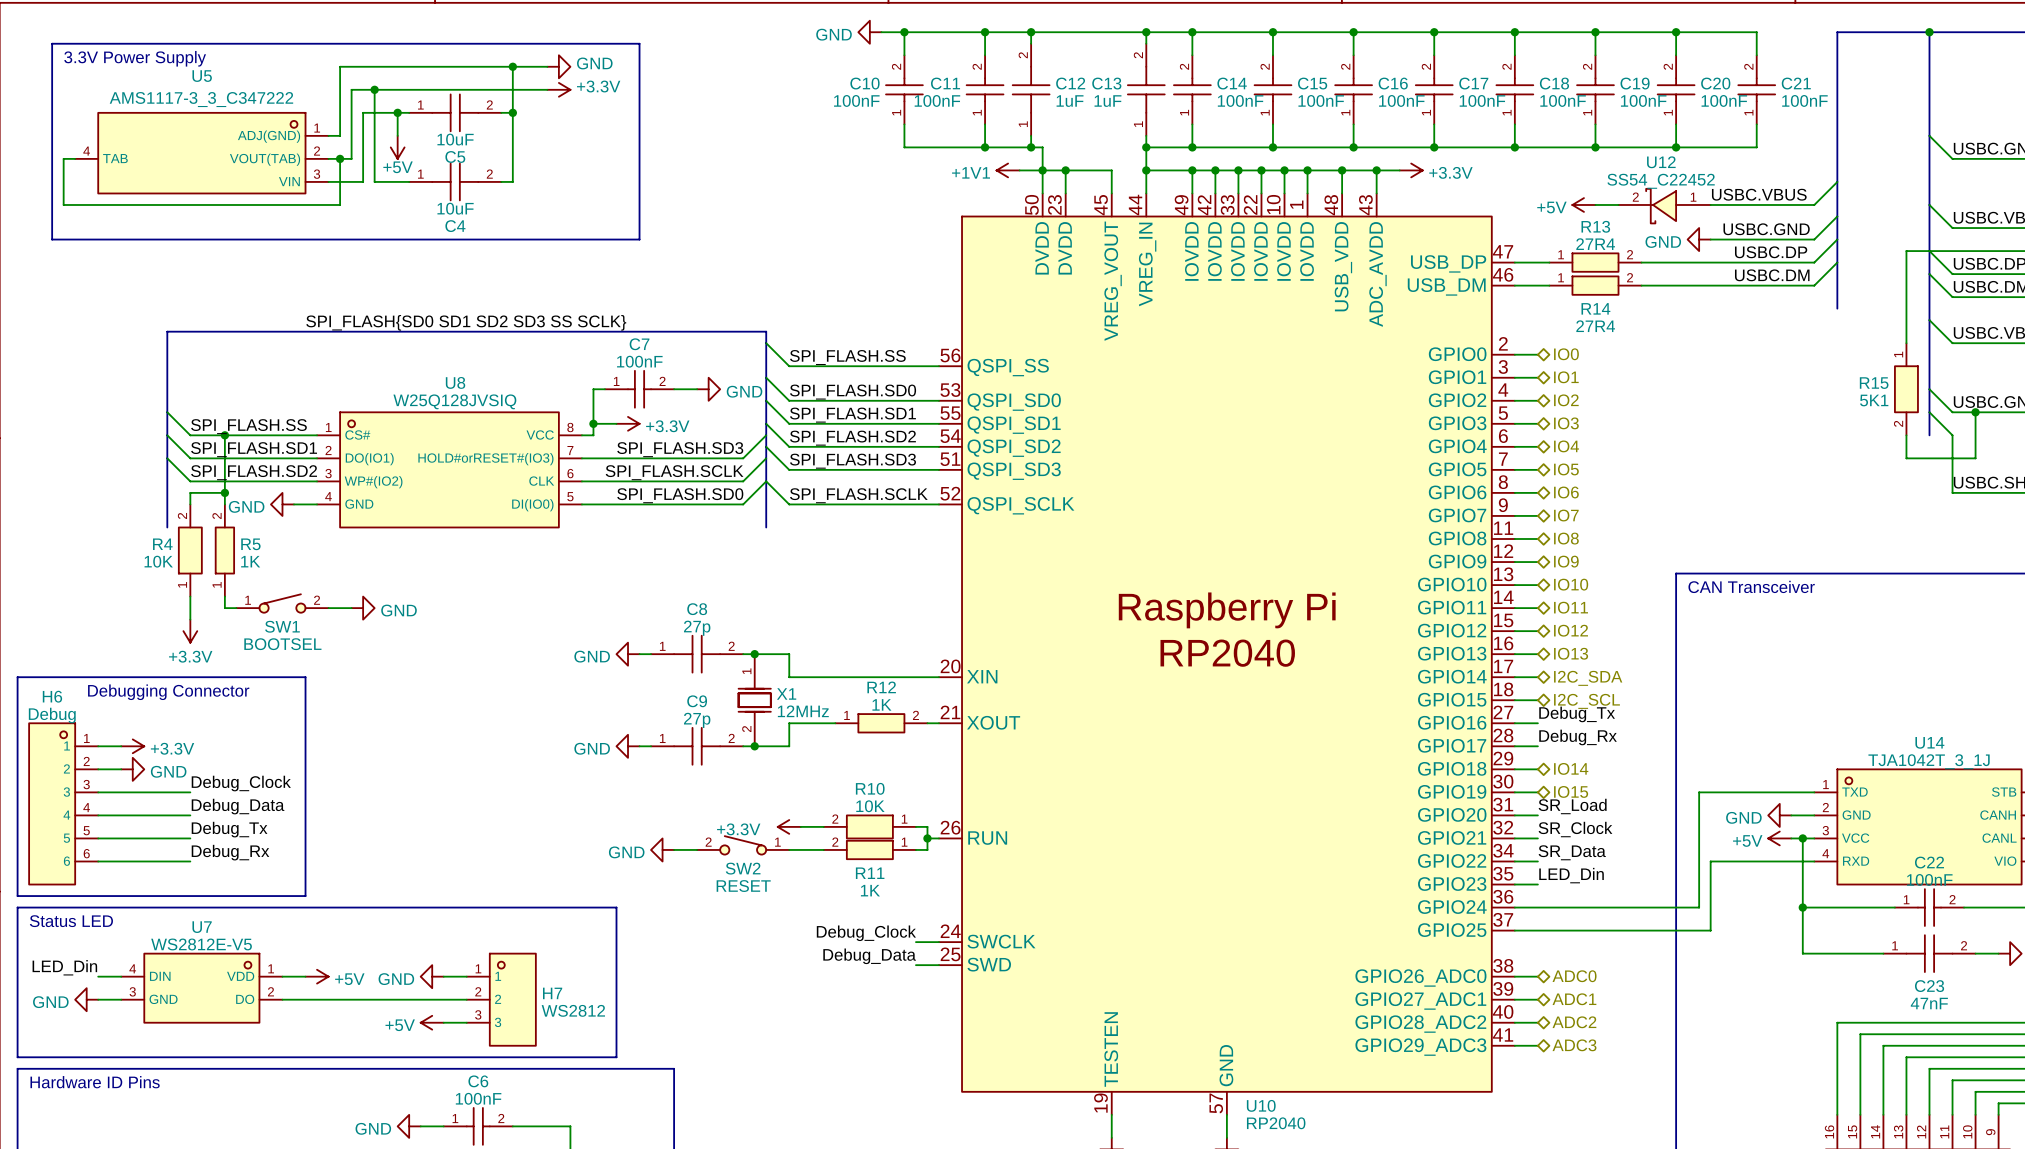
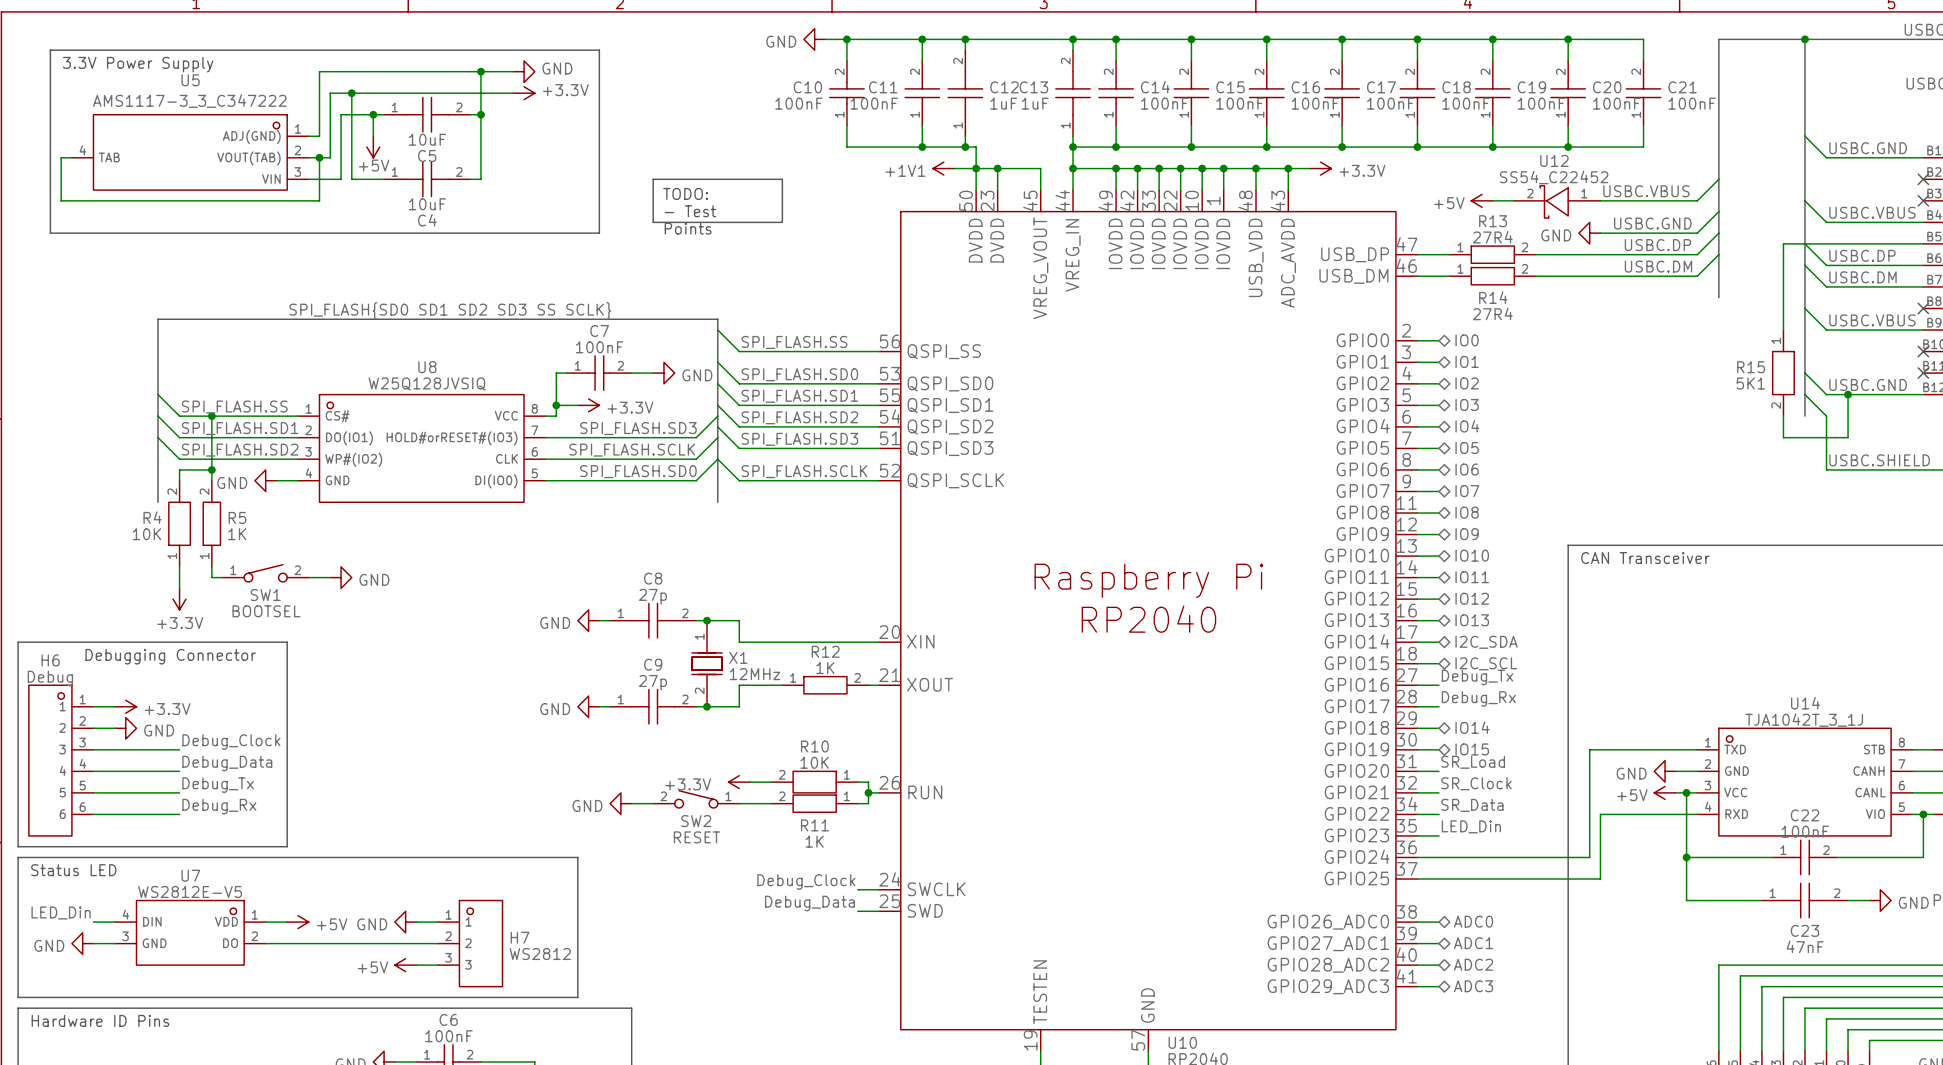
line: none -> (653, 179) (782, 179) (782, 222) (653, 222) (653, 179)
text: none -> TODO: (685, 193)
text: none -> - Test (690, 211)
text: none -> Points (688, 228)

